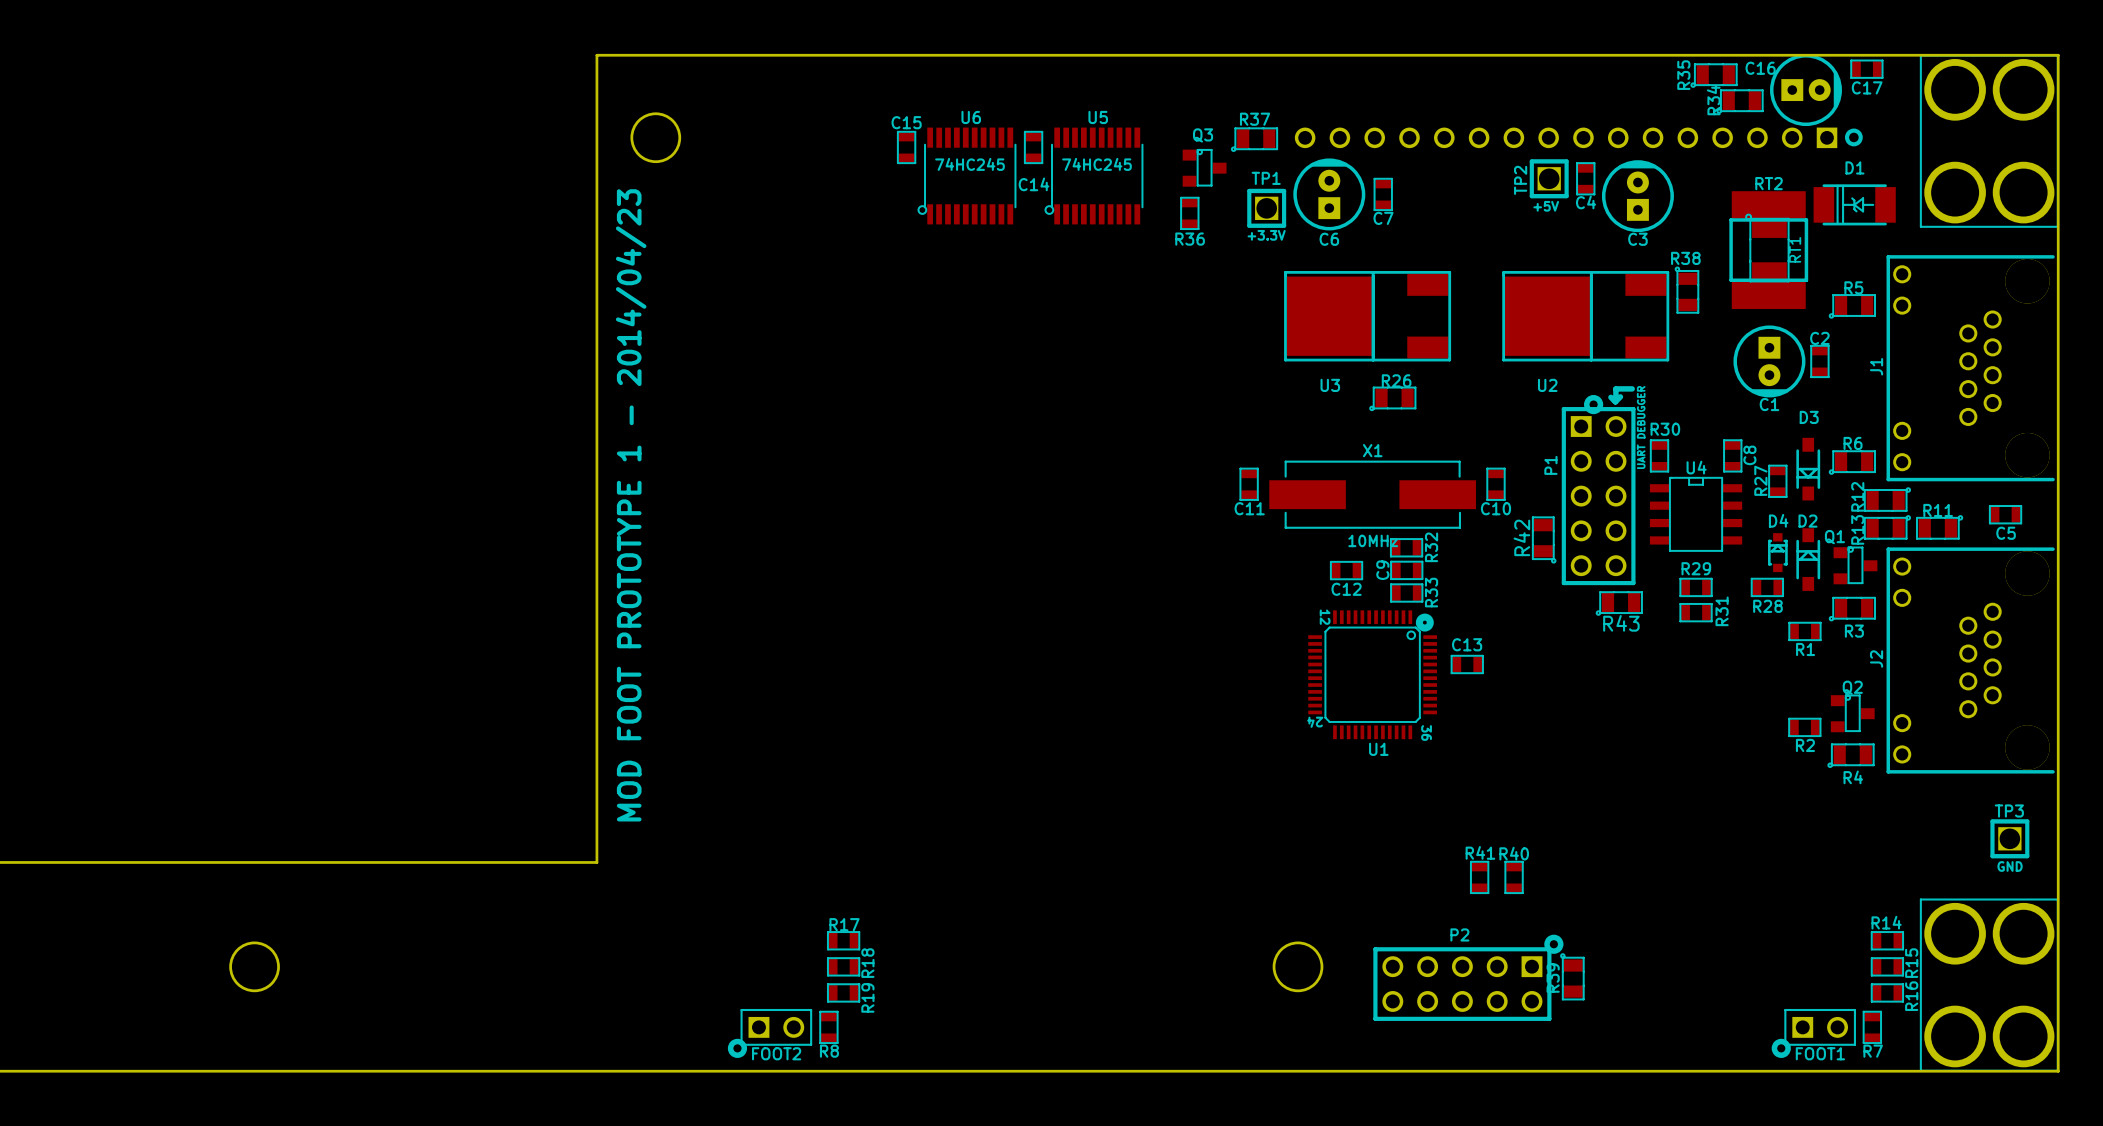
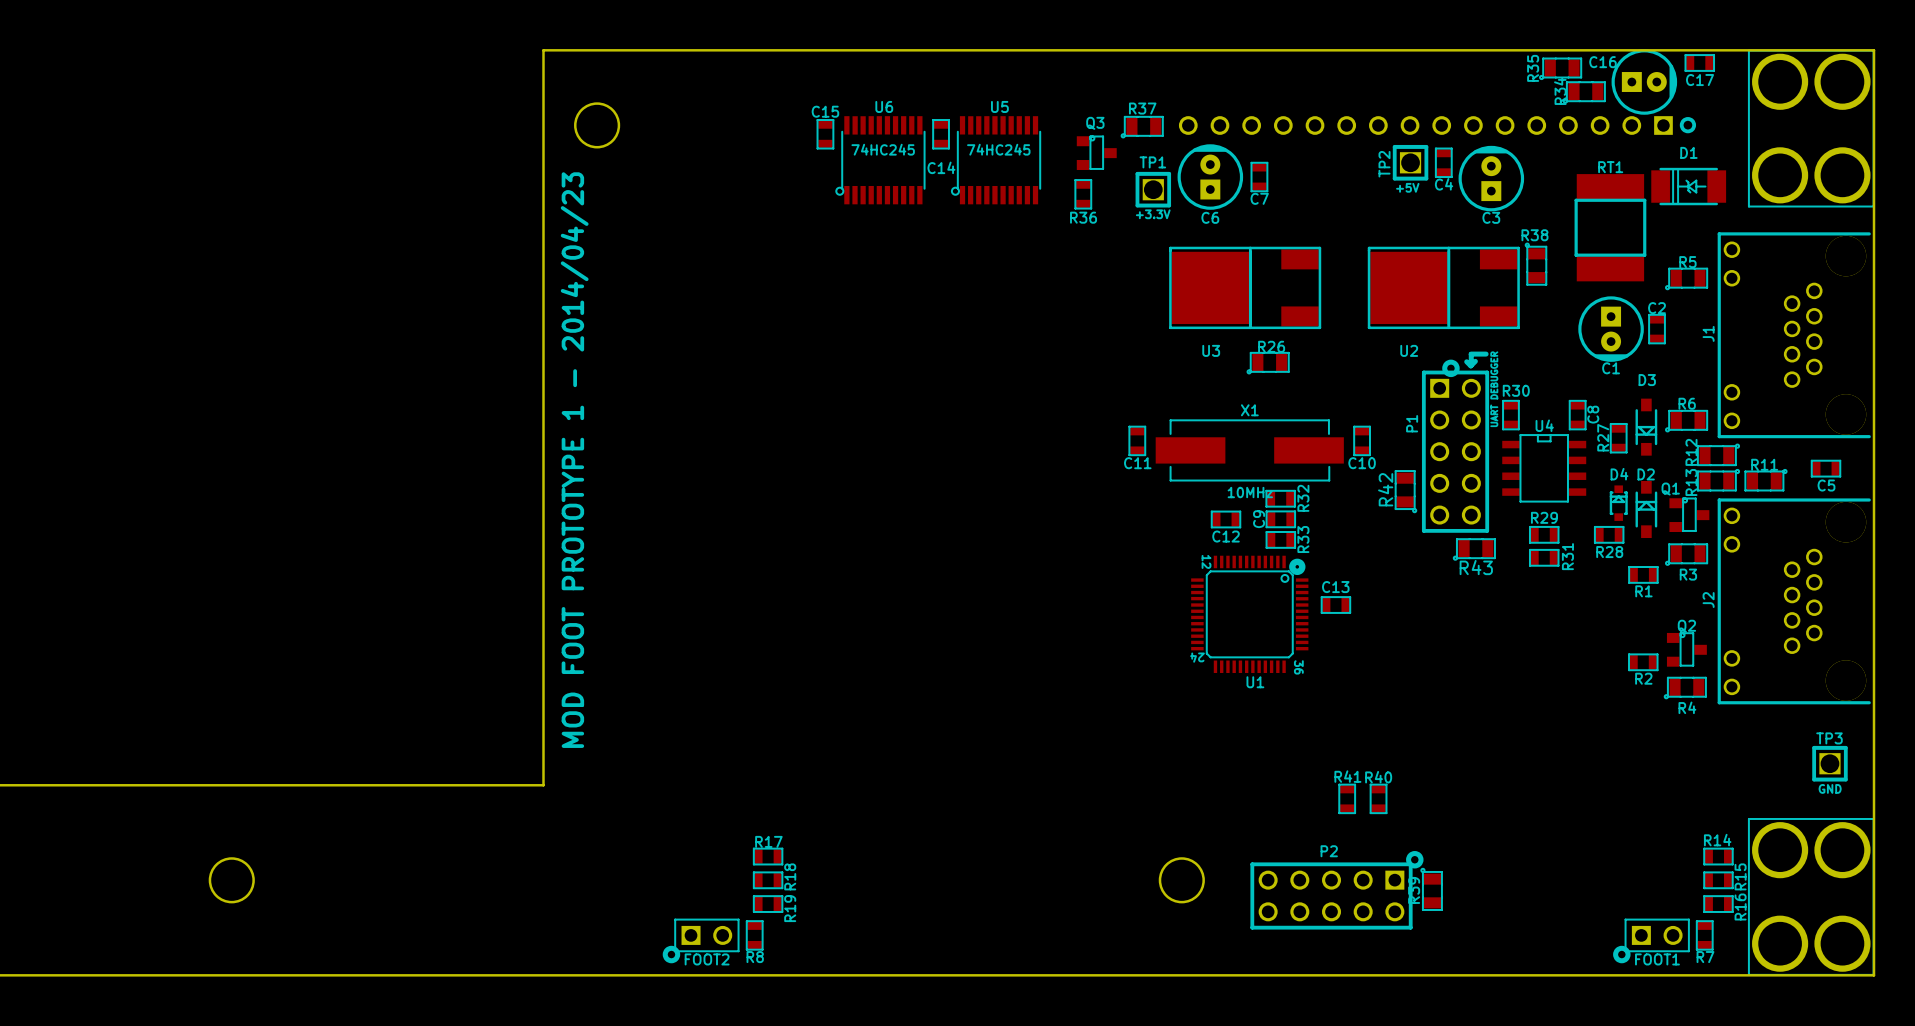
RT2 name: RT2 (1769, 183) -> RT1 (1610, 167)
RT1: (1767, 248) -> none

